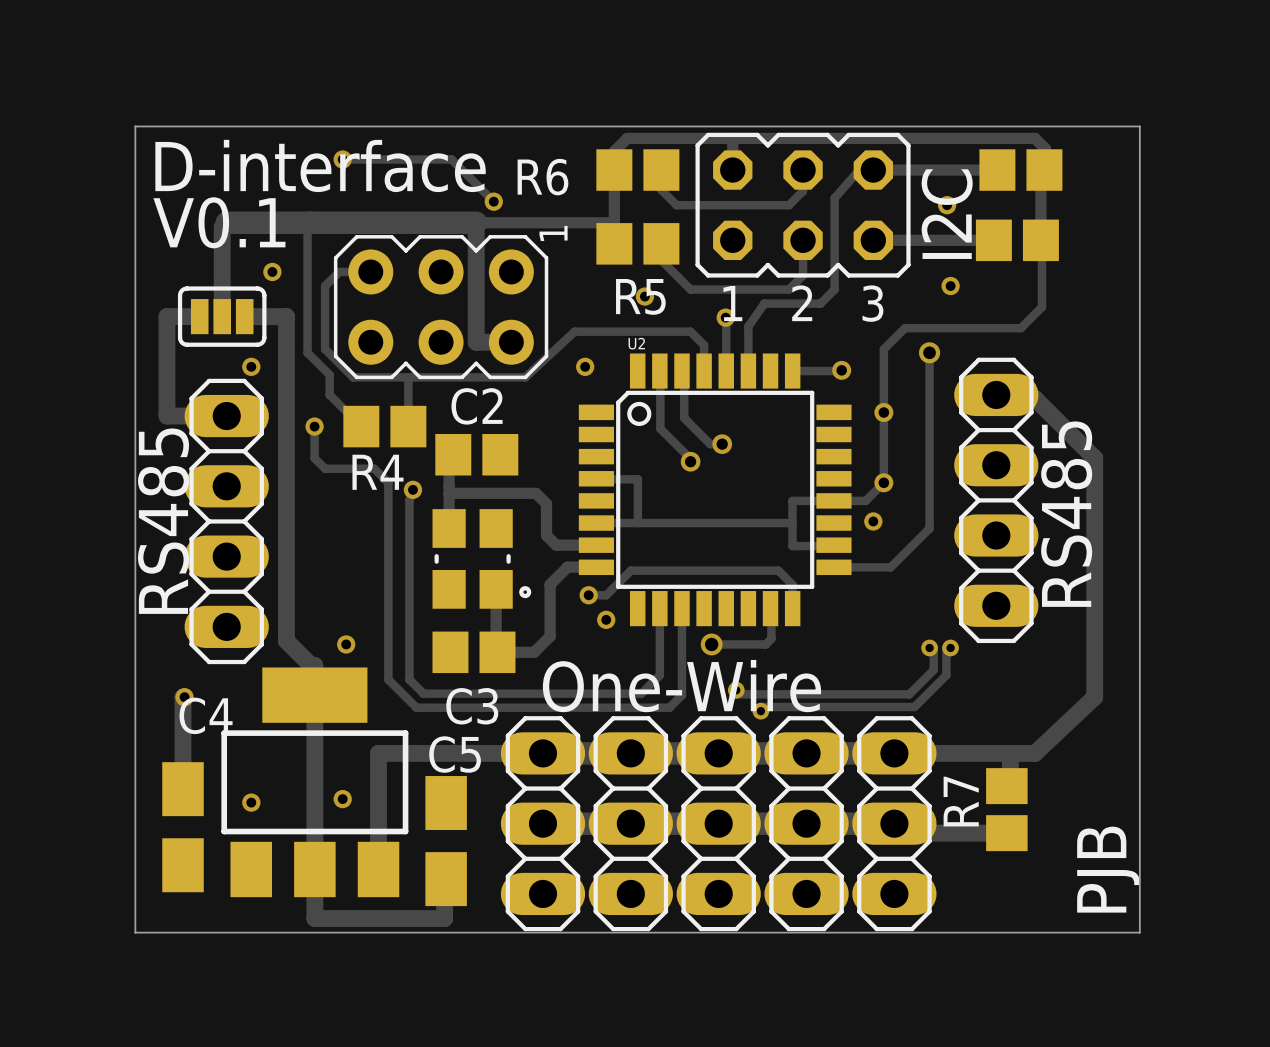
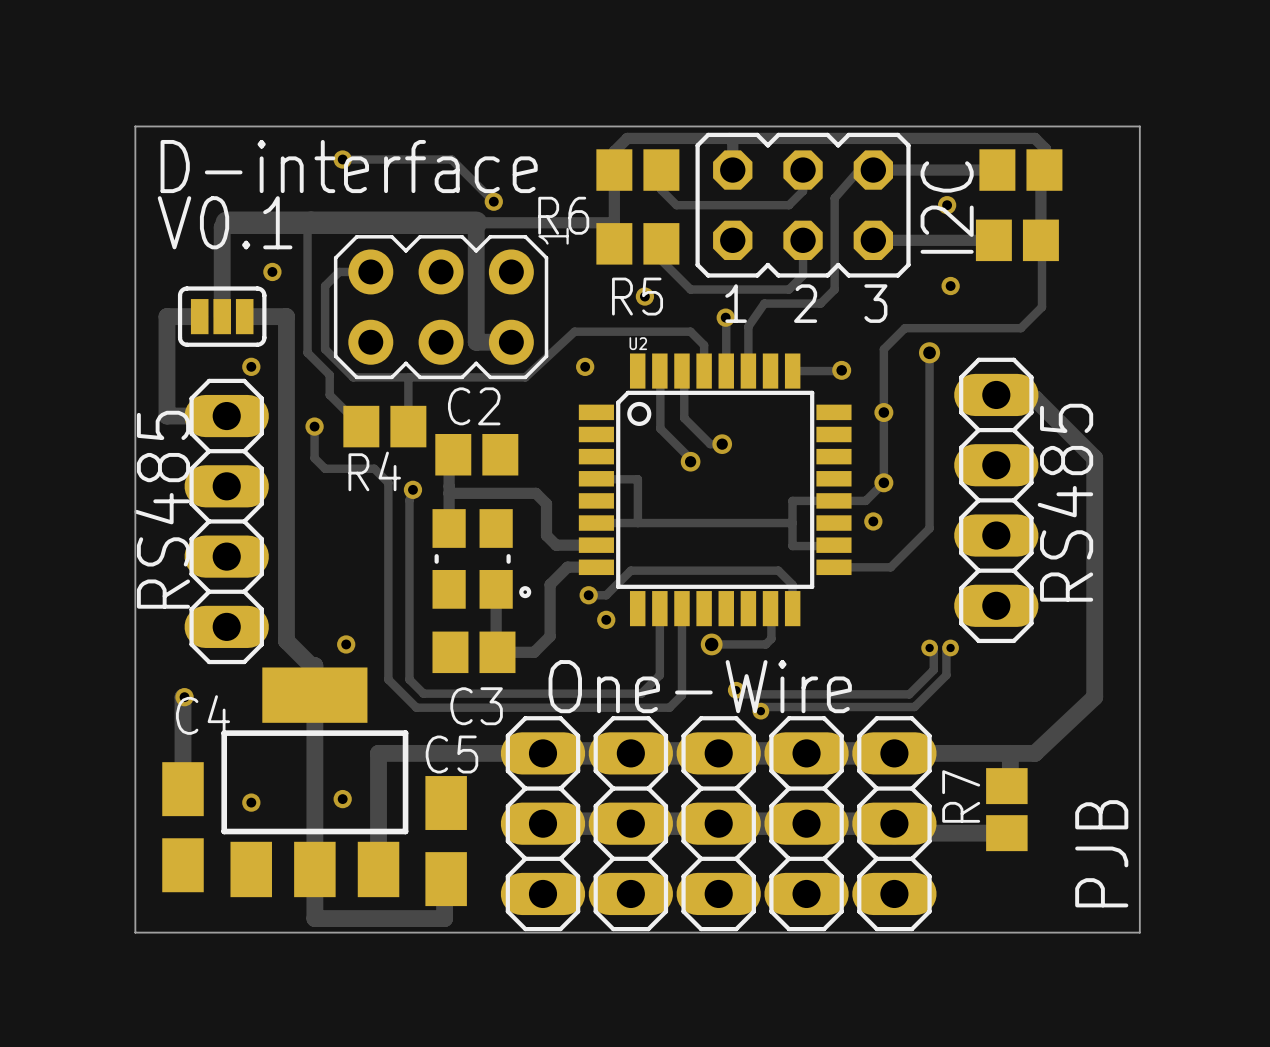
R6 name position: R6 (543, 177) -> R6 (563, 215)

